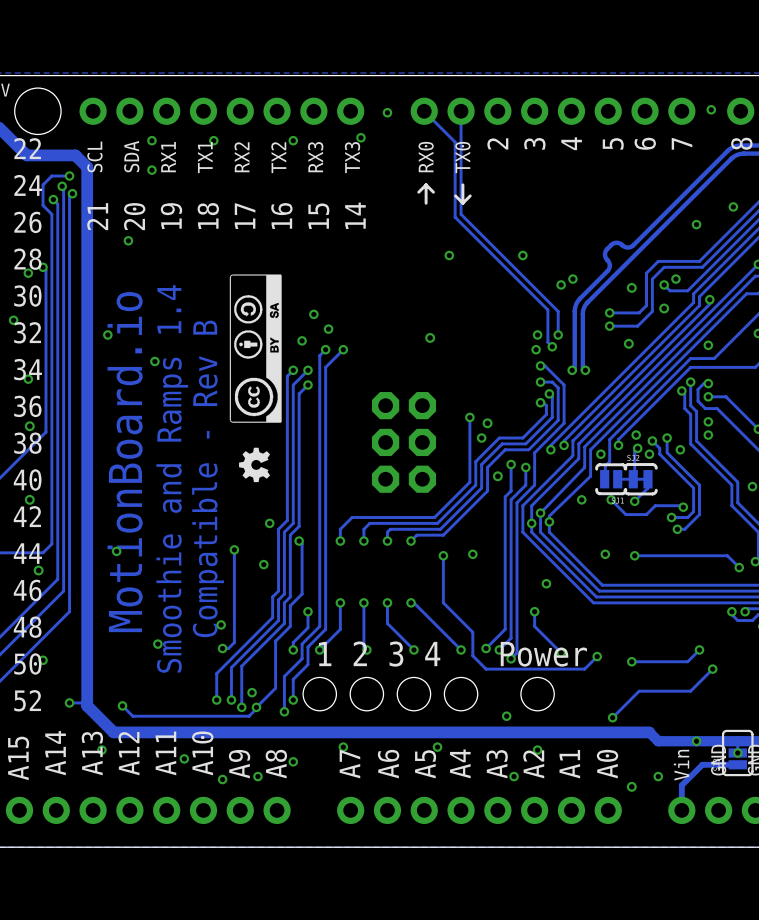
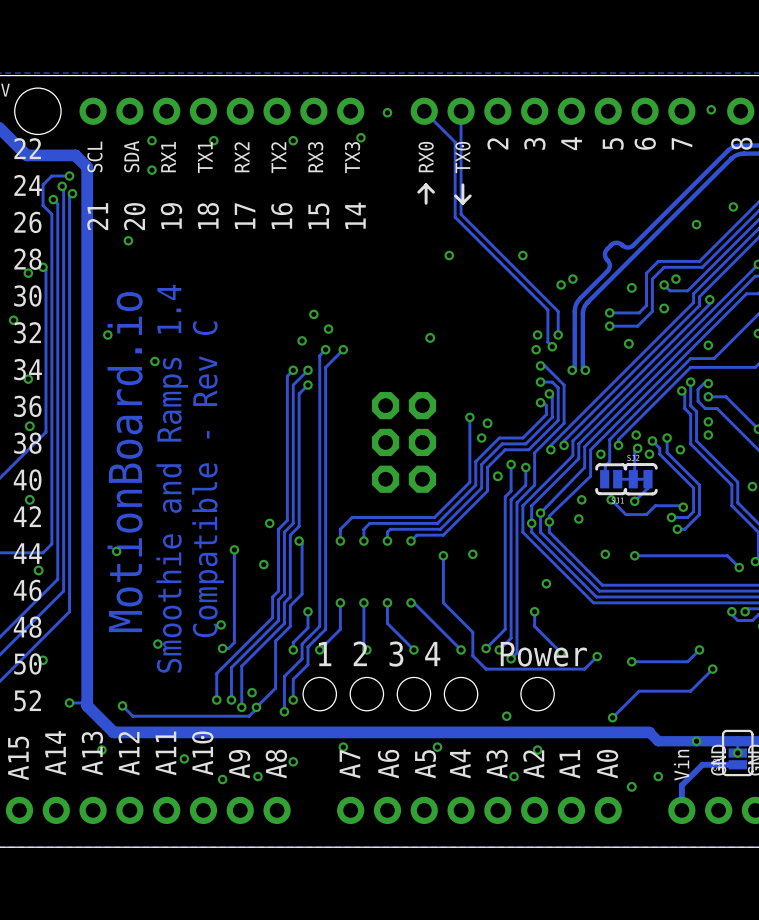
drawing: [229, 274, 282, 423] -> none
drawing: [239, 447, 271, 483] -> none
text: Compatible - Rev B (208, 478) -> Compatible - Rev C (208, 479)
via: none -> (578, 518)

